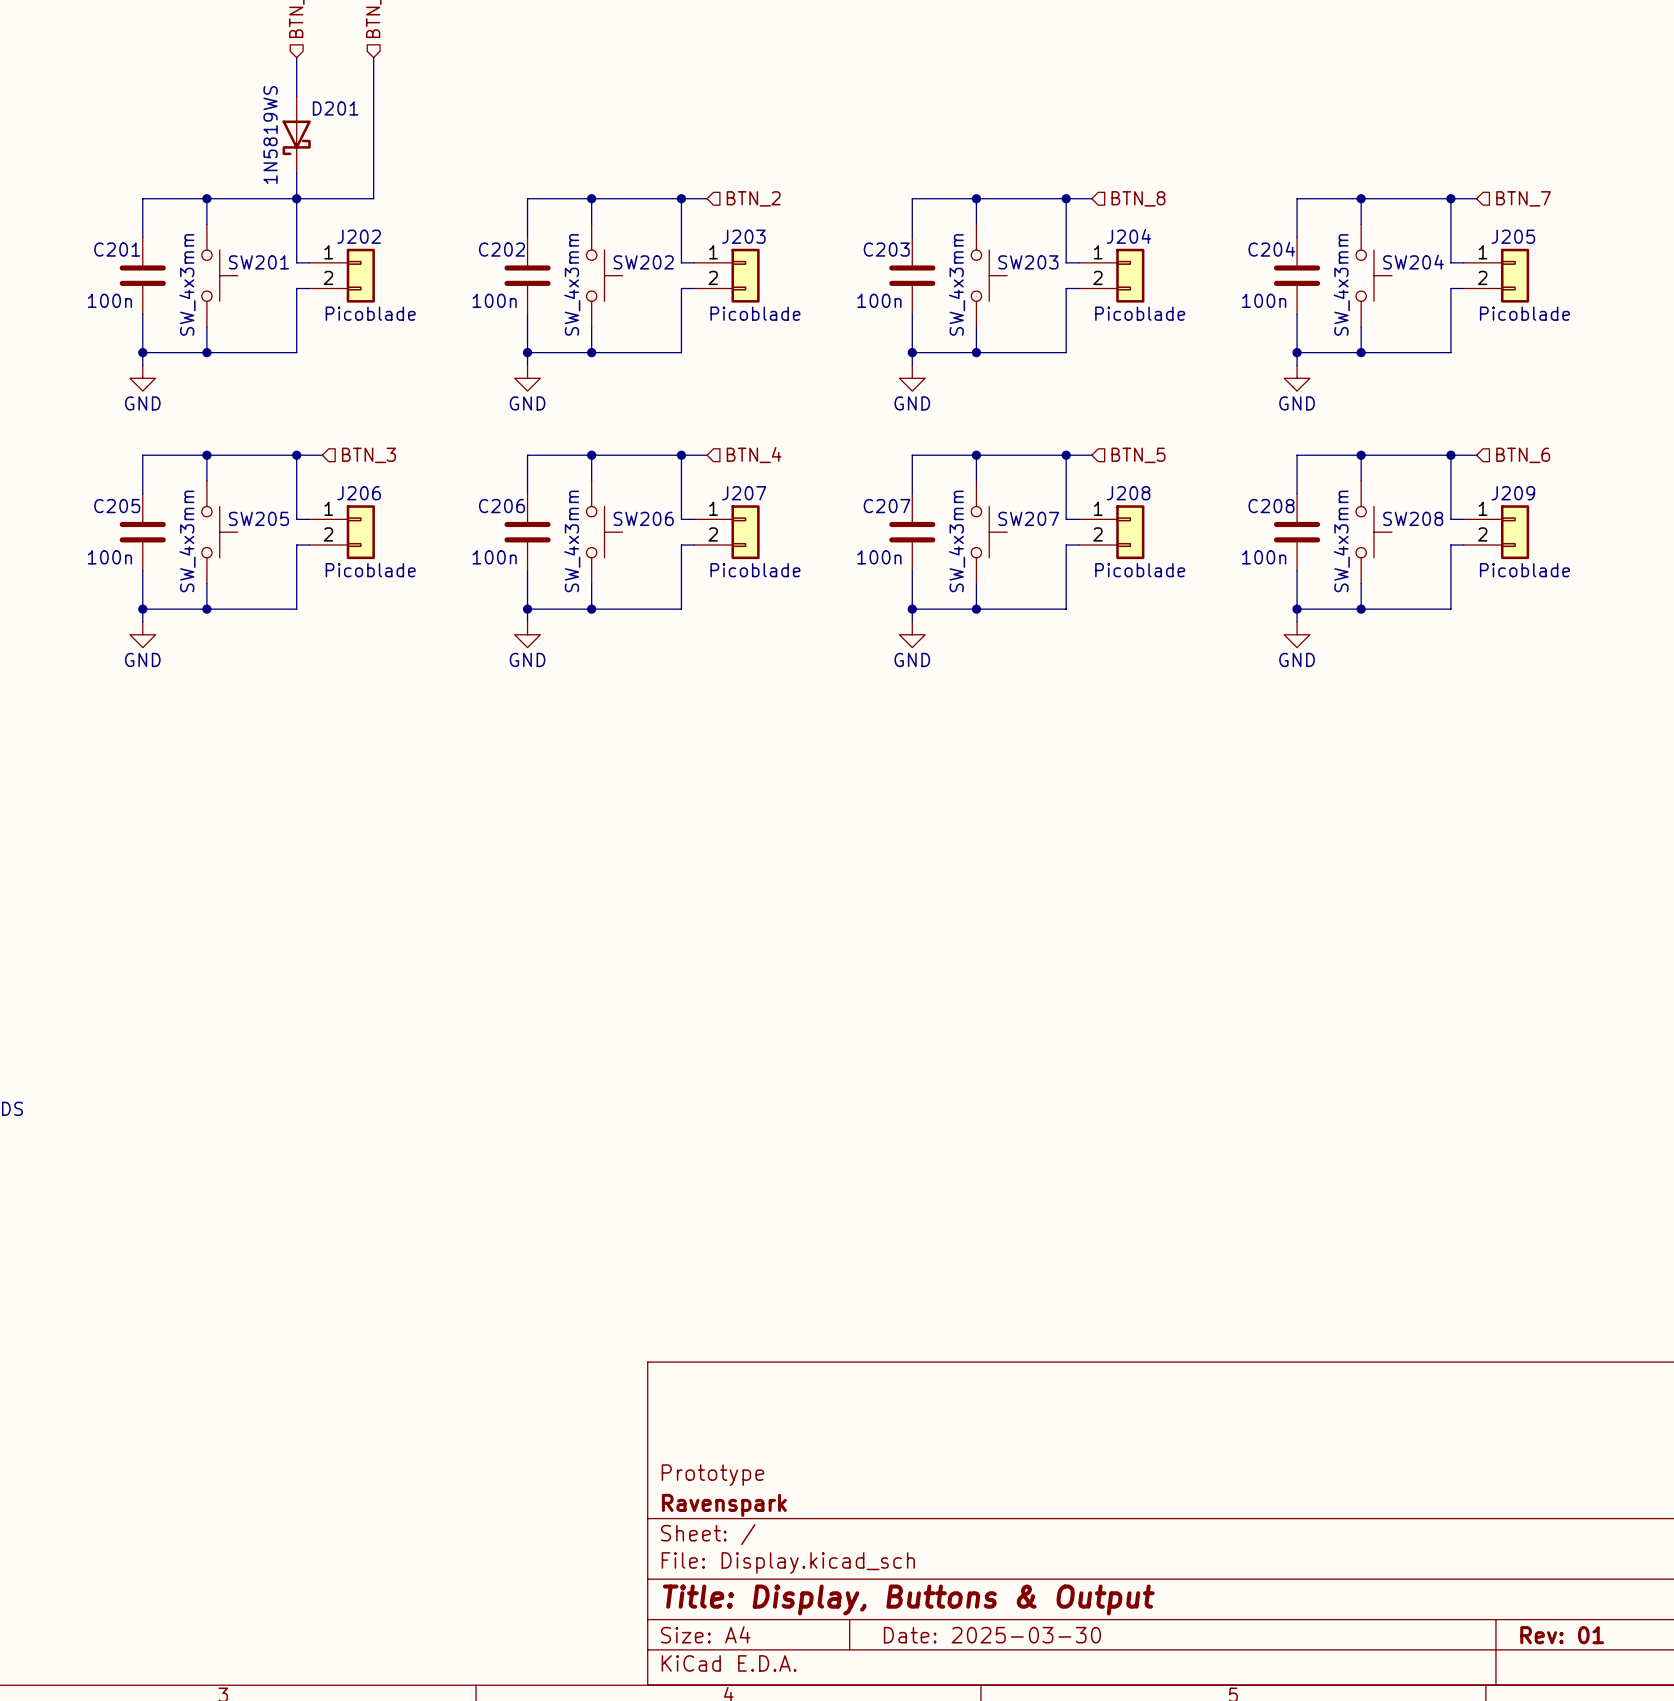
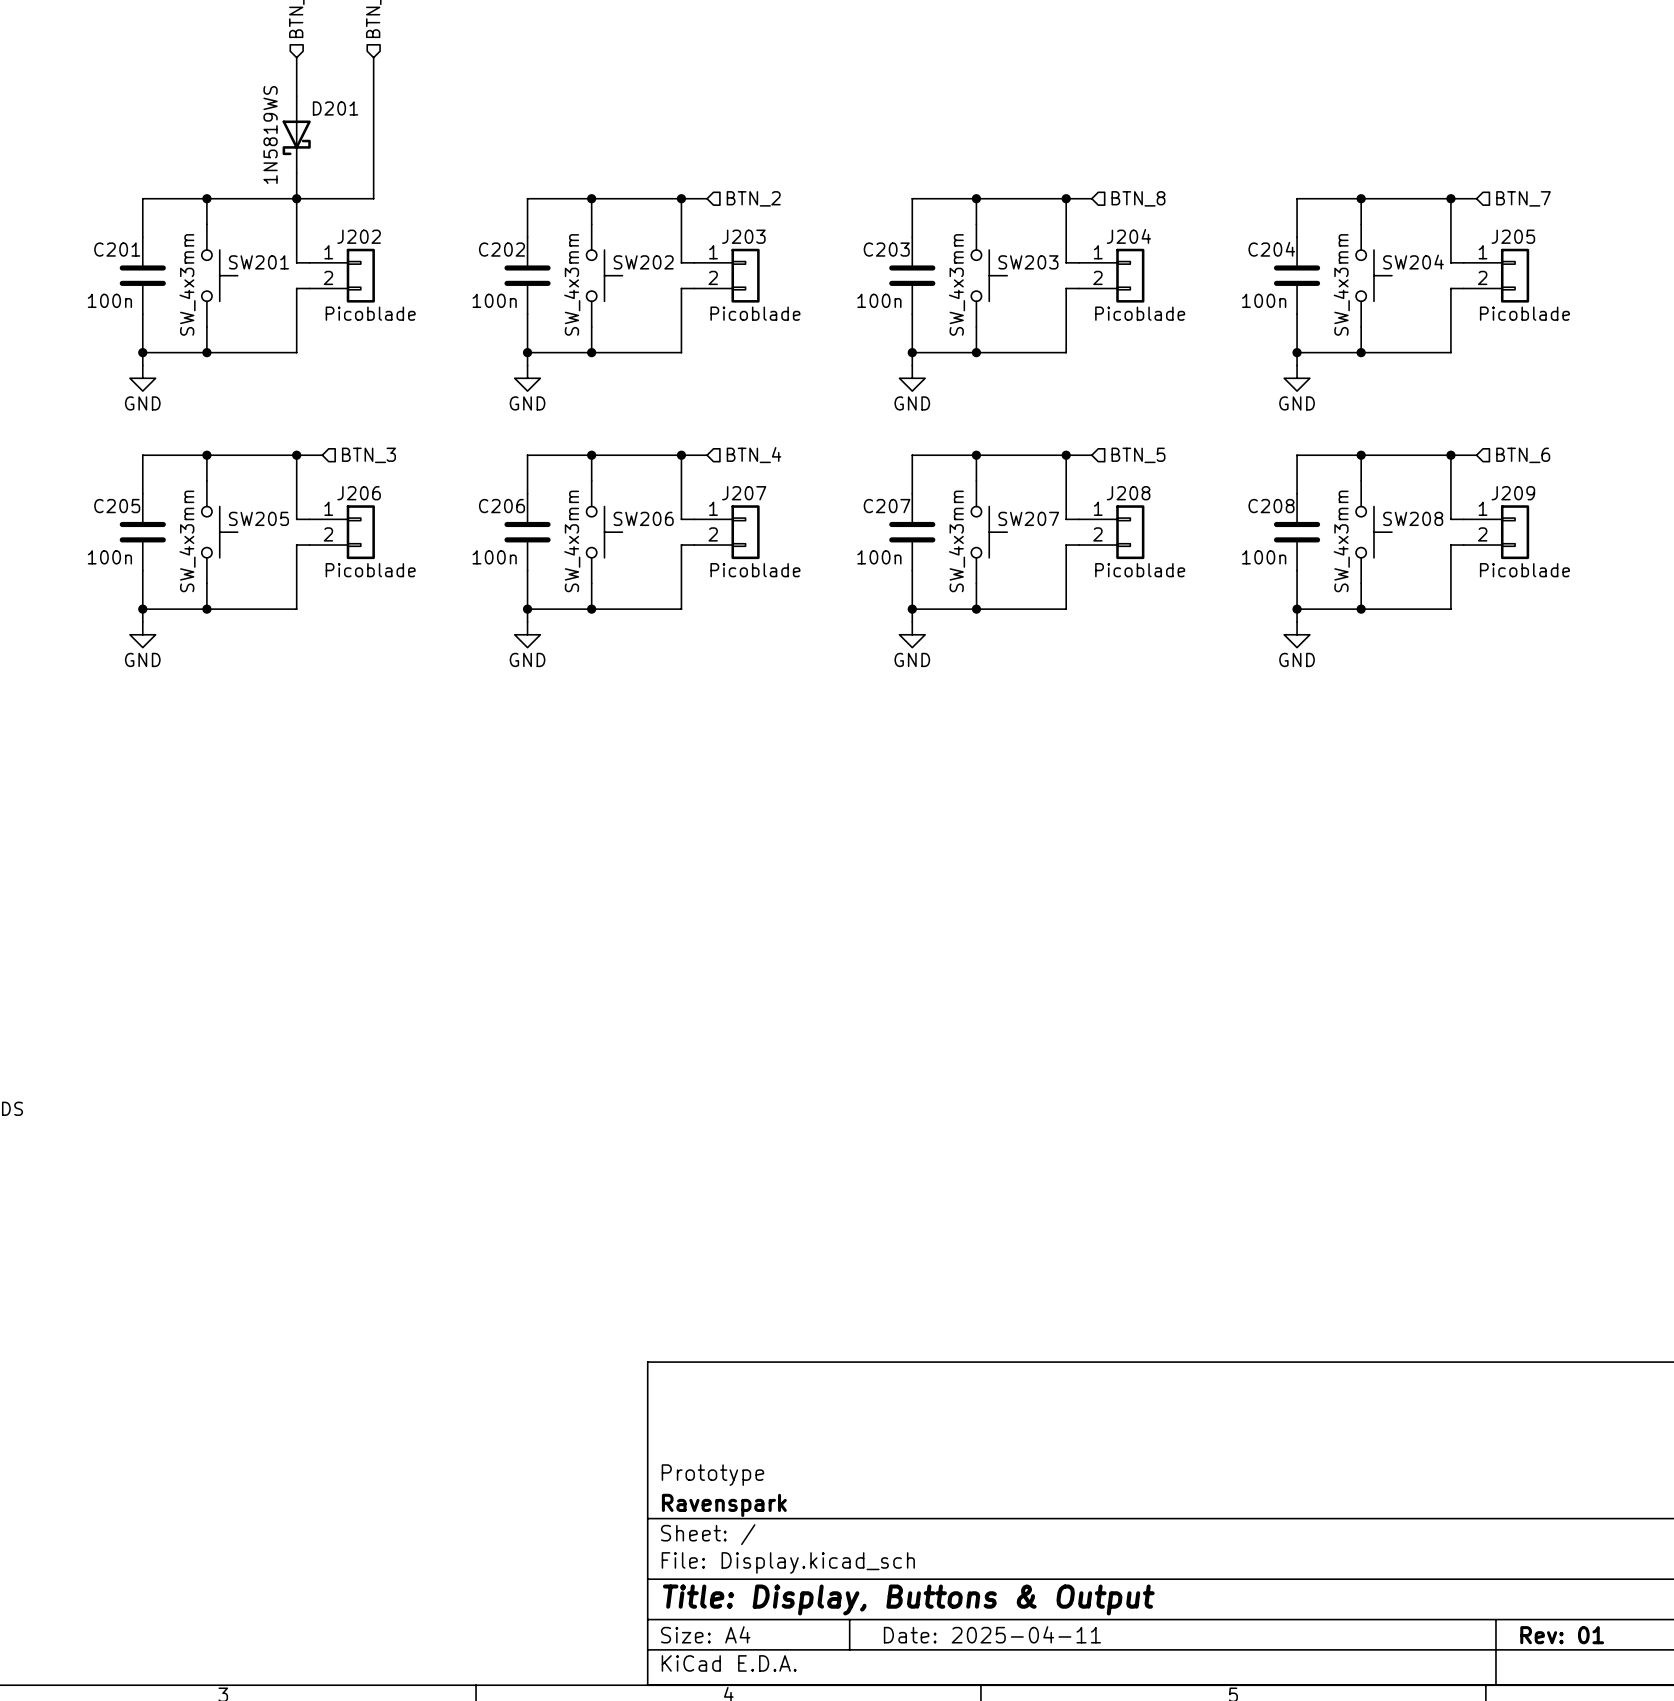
title block: Date: 2025-03-30 (992, 1635) -> Date: 2025-04-11 (992, 1634)

